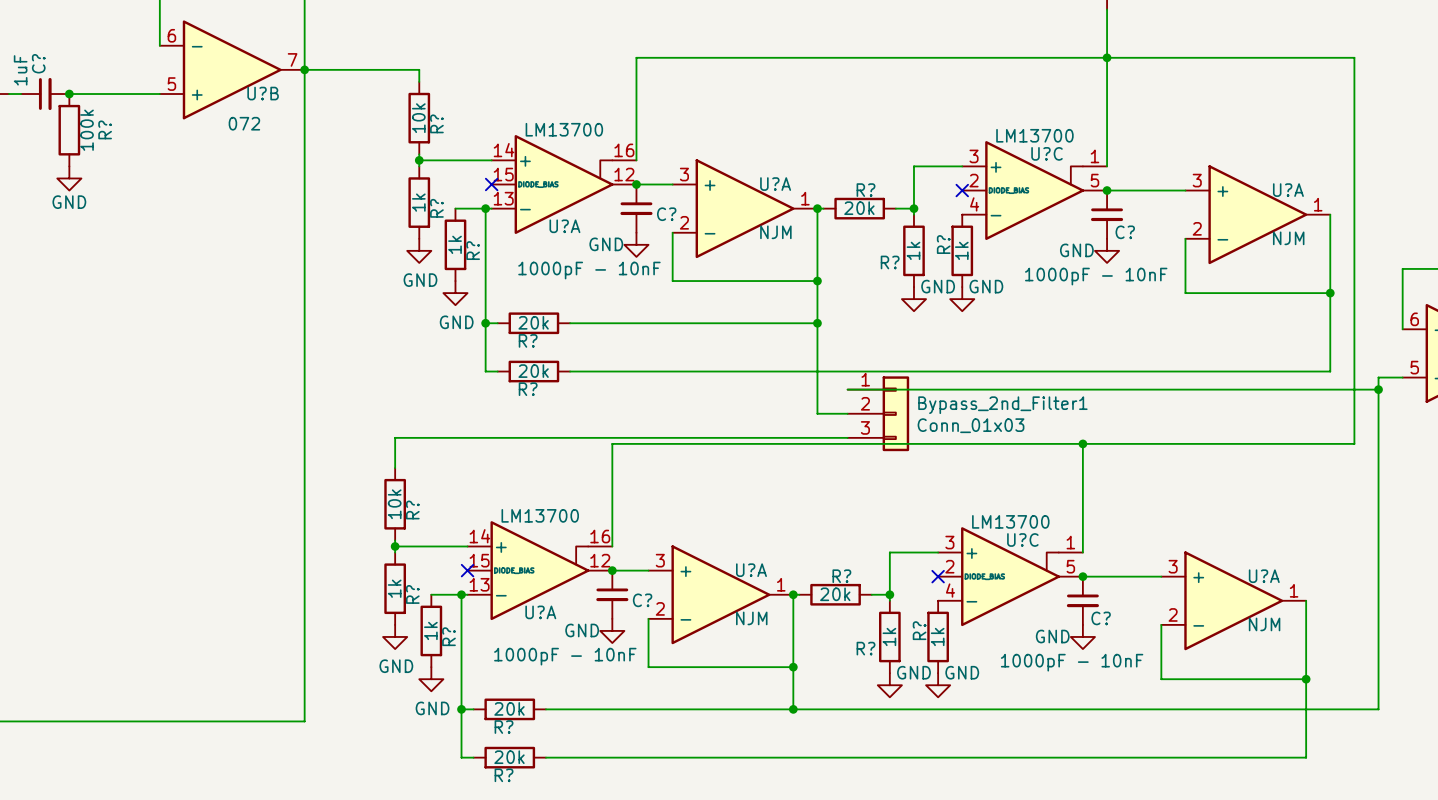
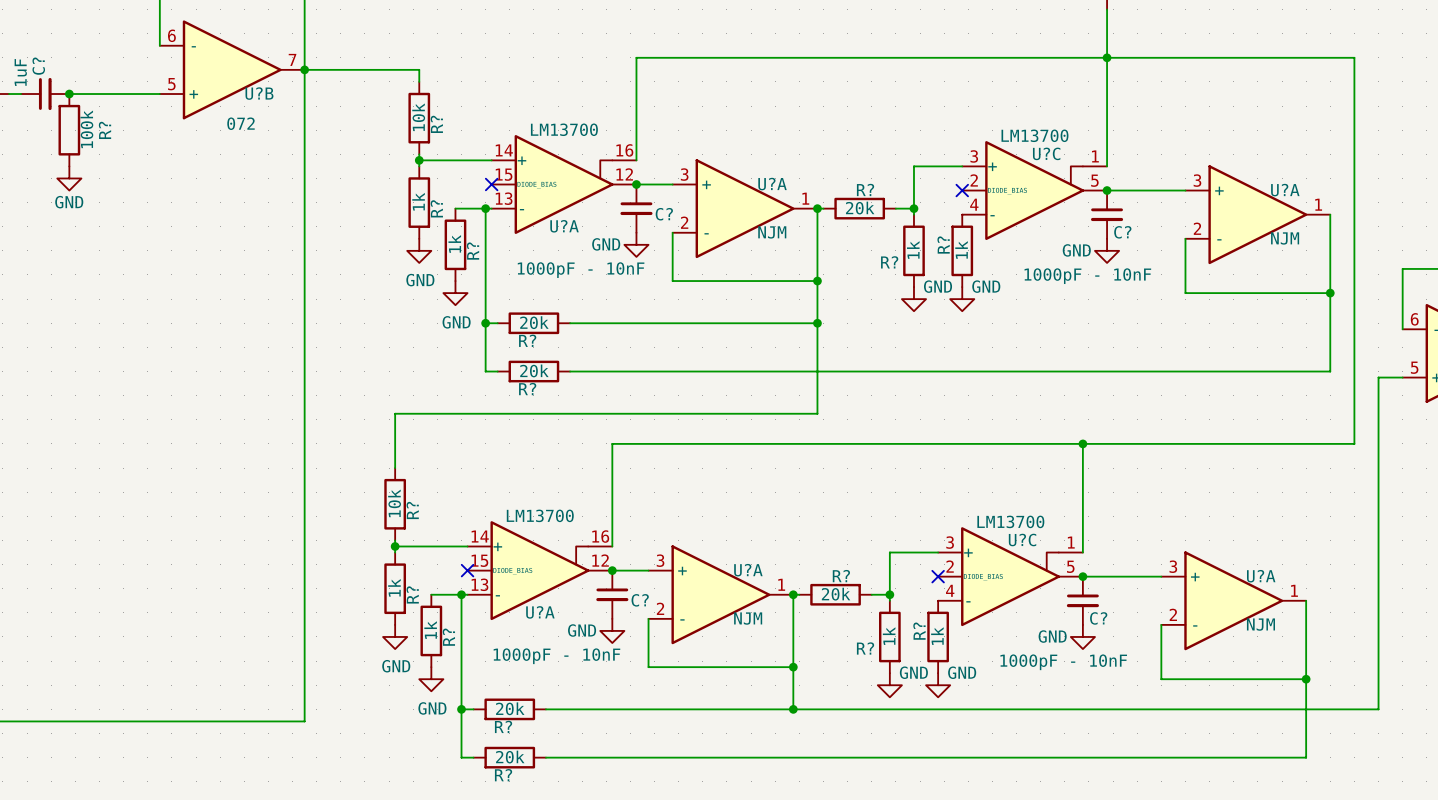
wire: (847, 389) (1378, 389) -> none
junction: (1378, 389) -> none
wire: (817, 413) (847, 413) -> none
Bypass_2nd_Filter1: Conn_01x03 (878, 413) -> none
wire: (395, 437) (847, 437) -> (395, 437) (395, 413) (817, 413)

